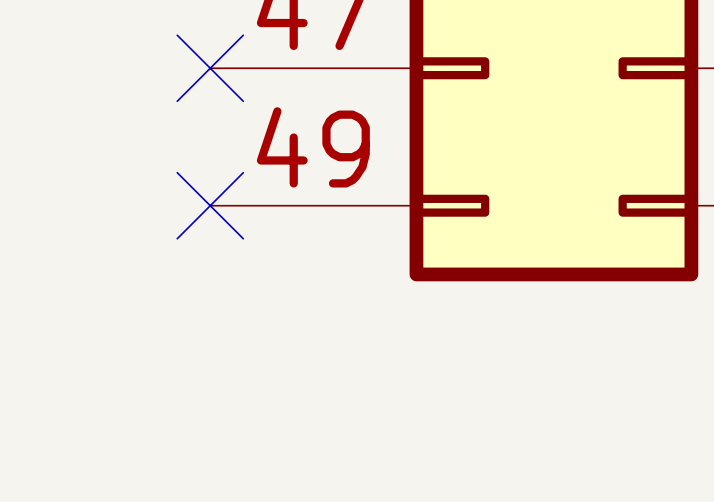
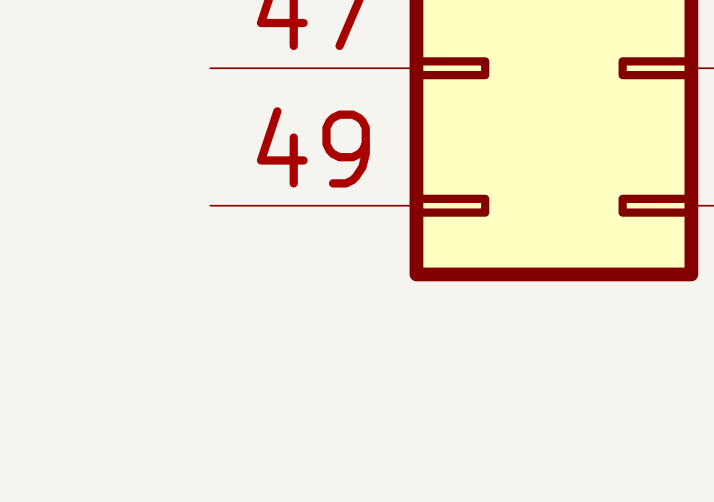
no-connect mark: (210, 68) -> none
no-connect mark: (210, 205) -> none

